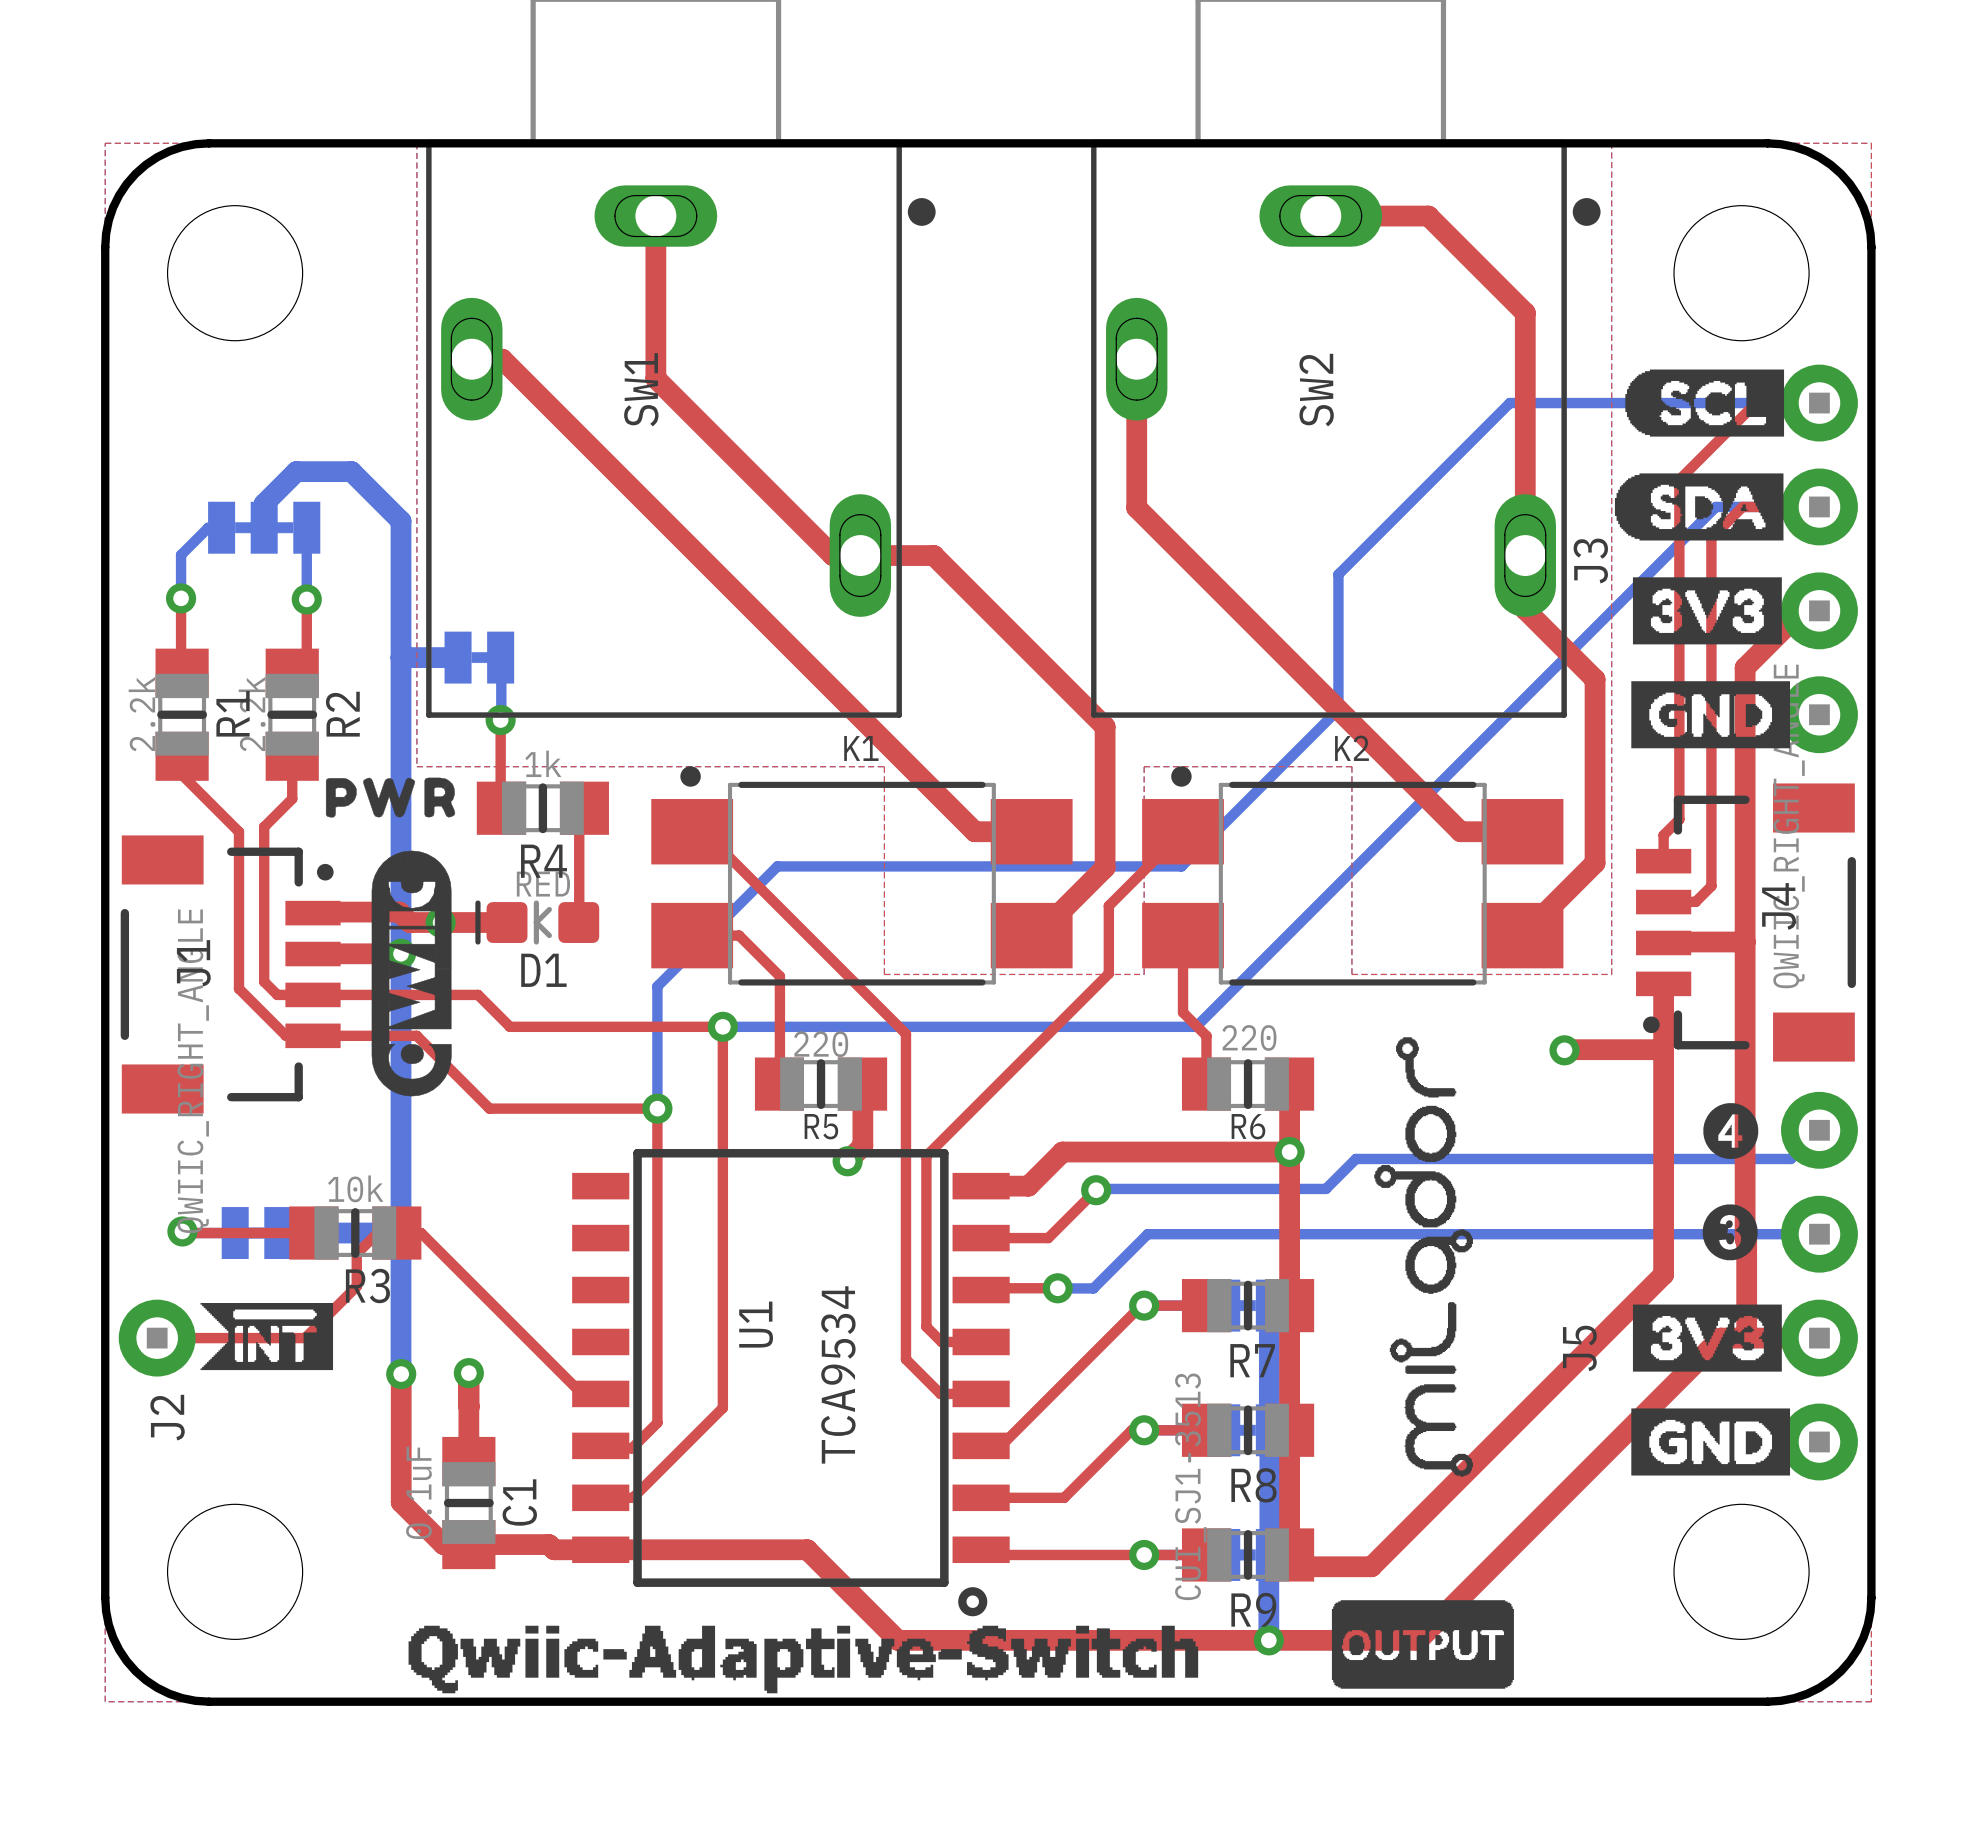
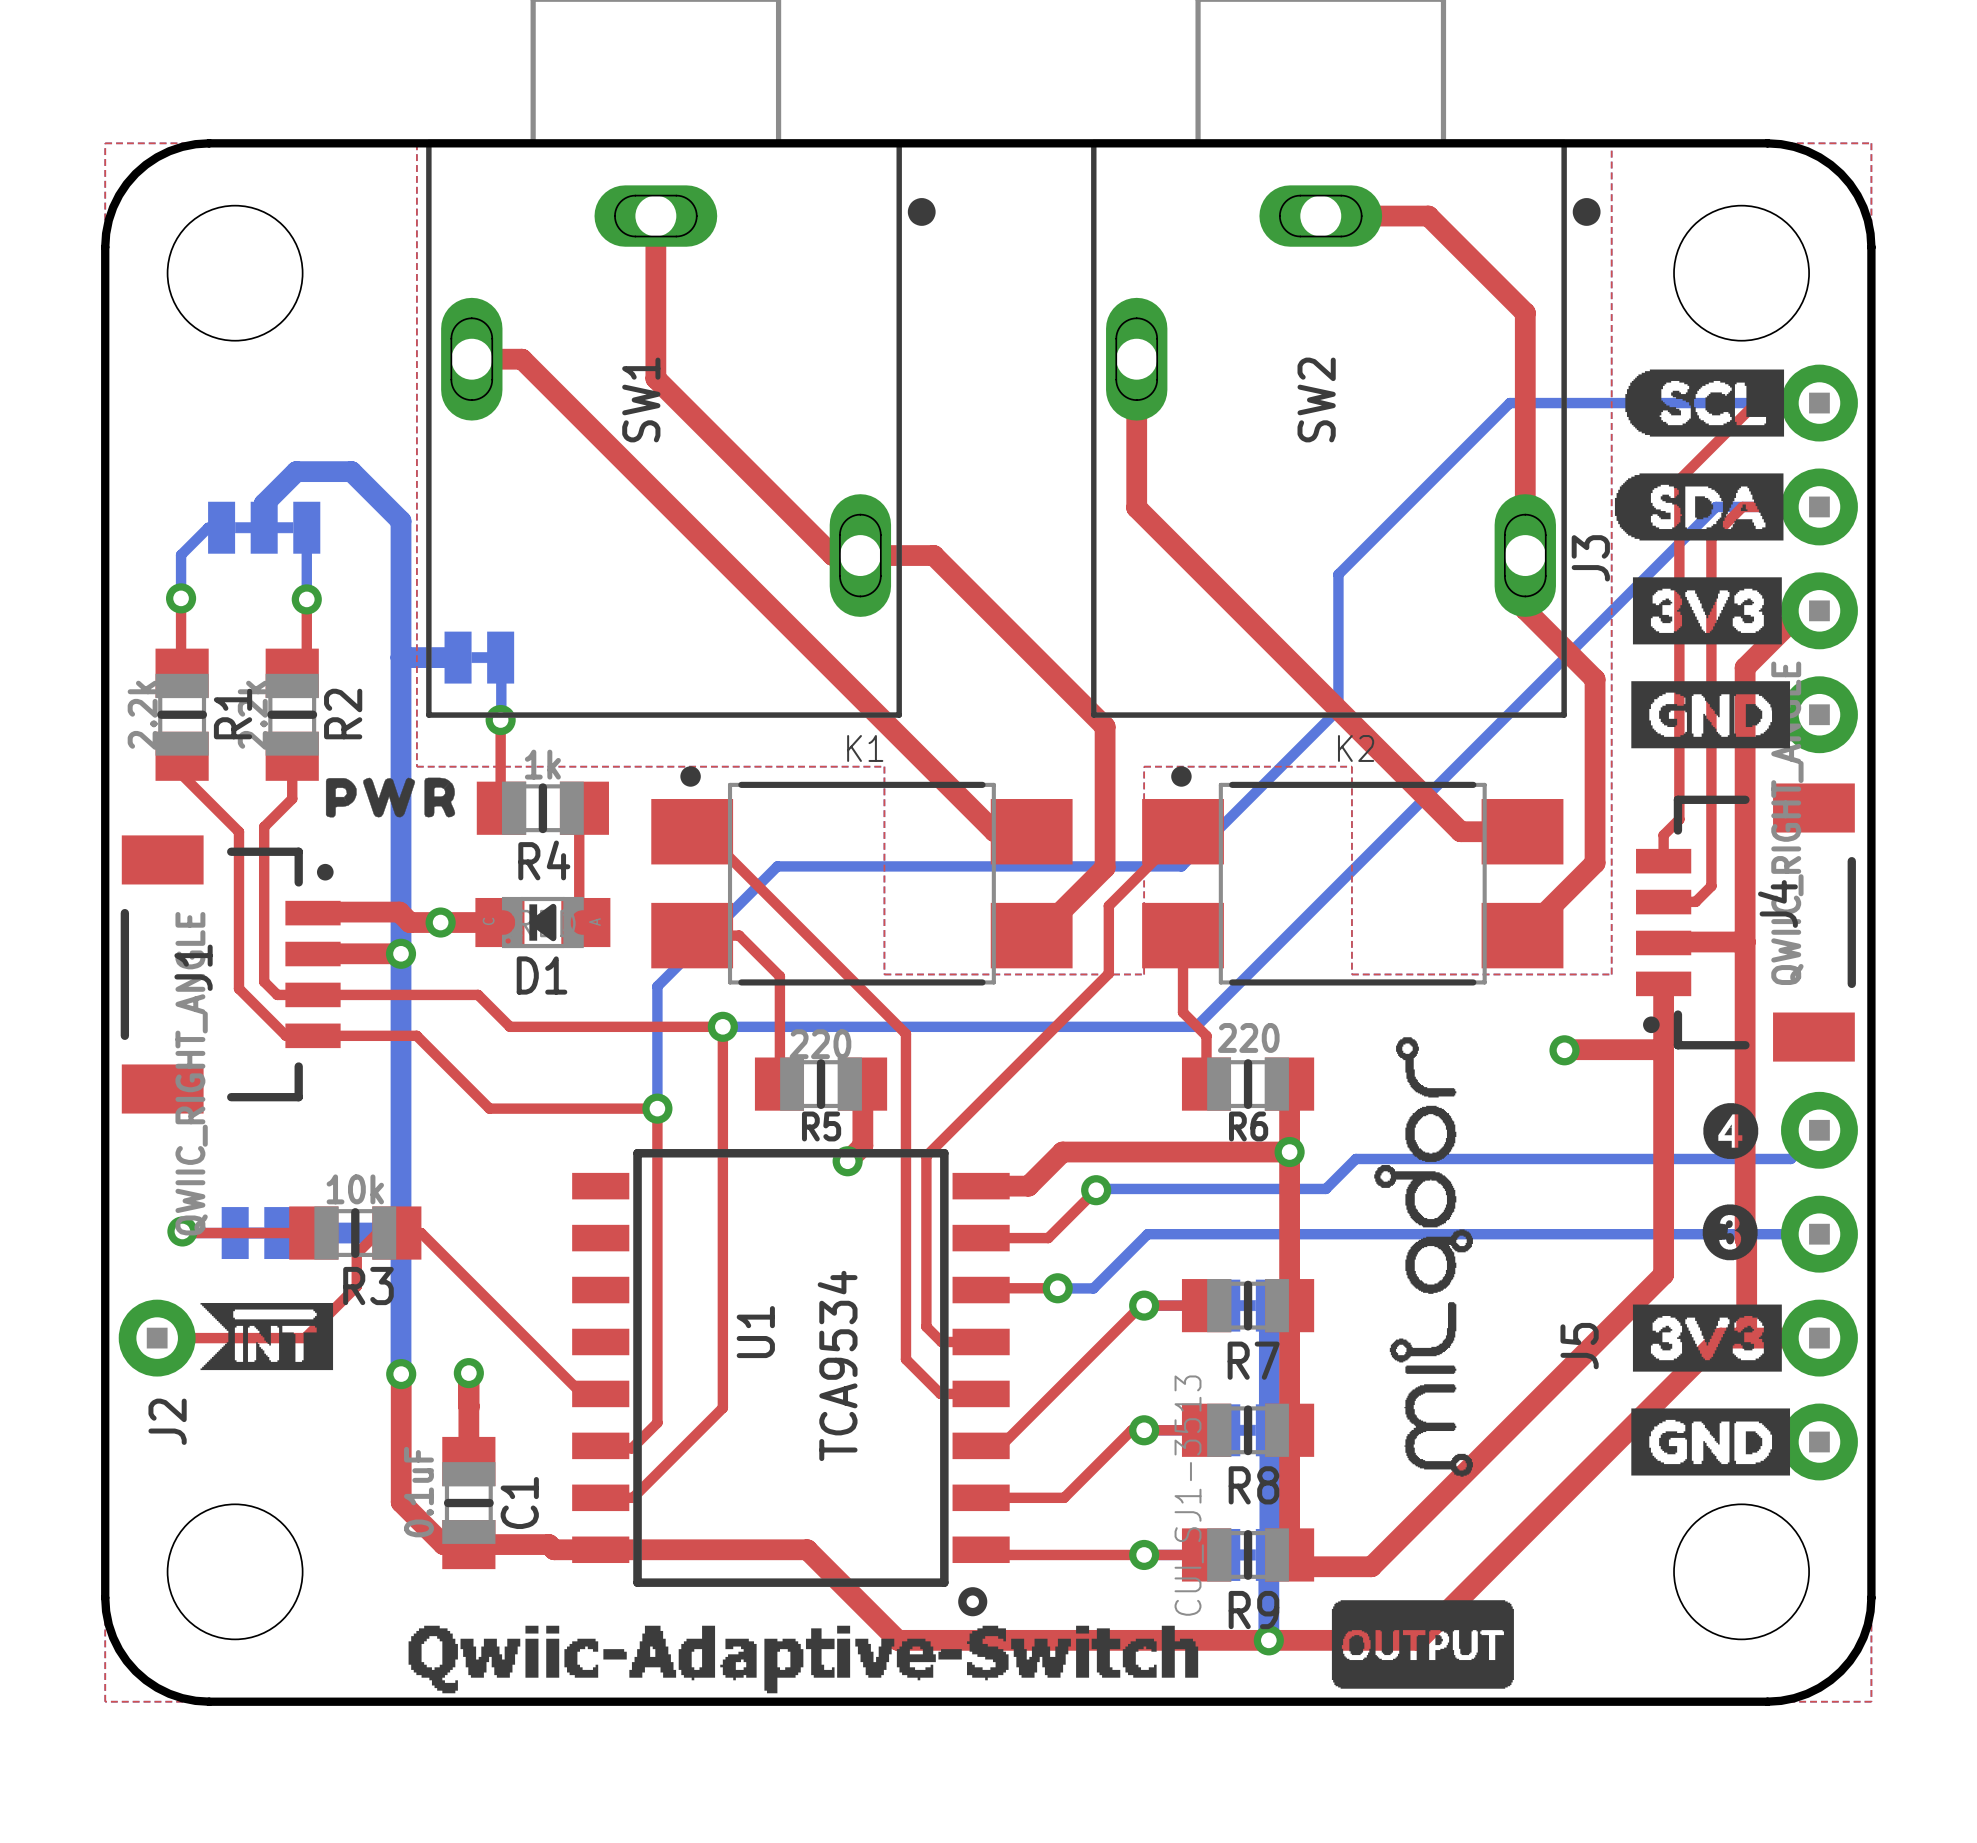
top track: (502, 359) (974, 831) (994, 831) -> (502, 359) (522, 359) (994, 831)
drawing: [371, 850, 452, 1097] -> none
D1 footprint: [475, 900, 600, 945] -> [475, 896, 611, 949]

